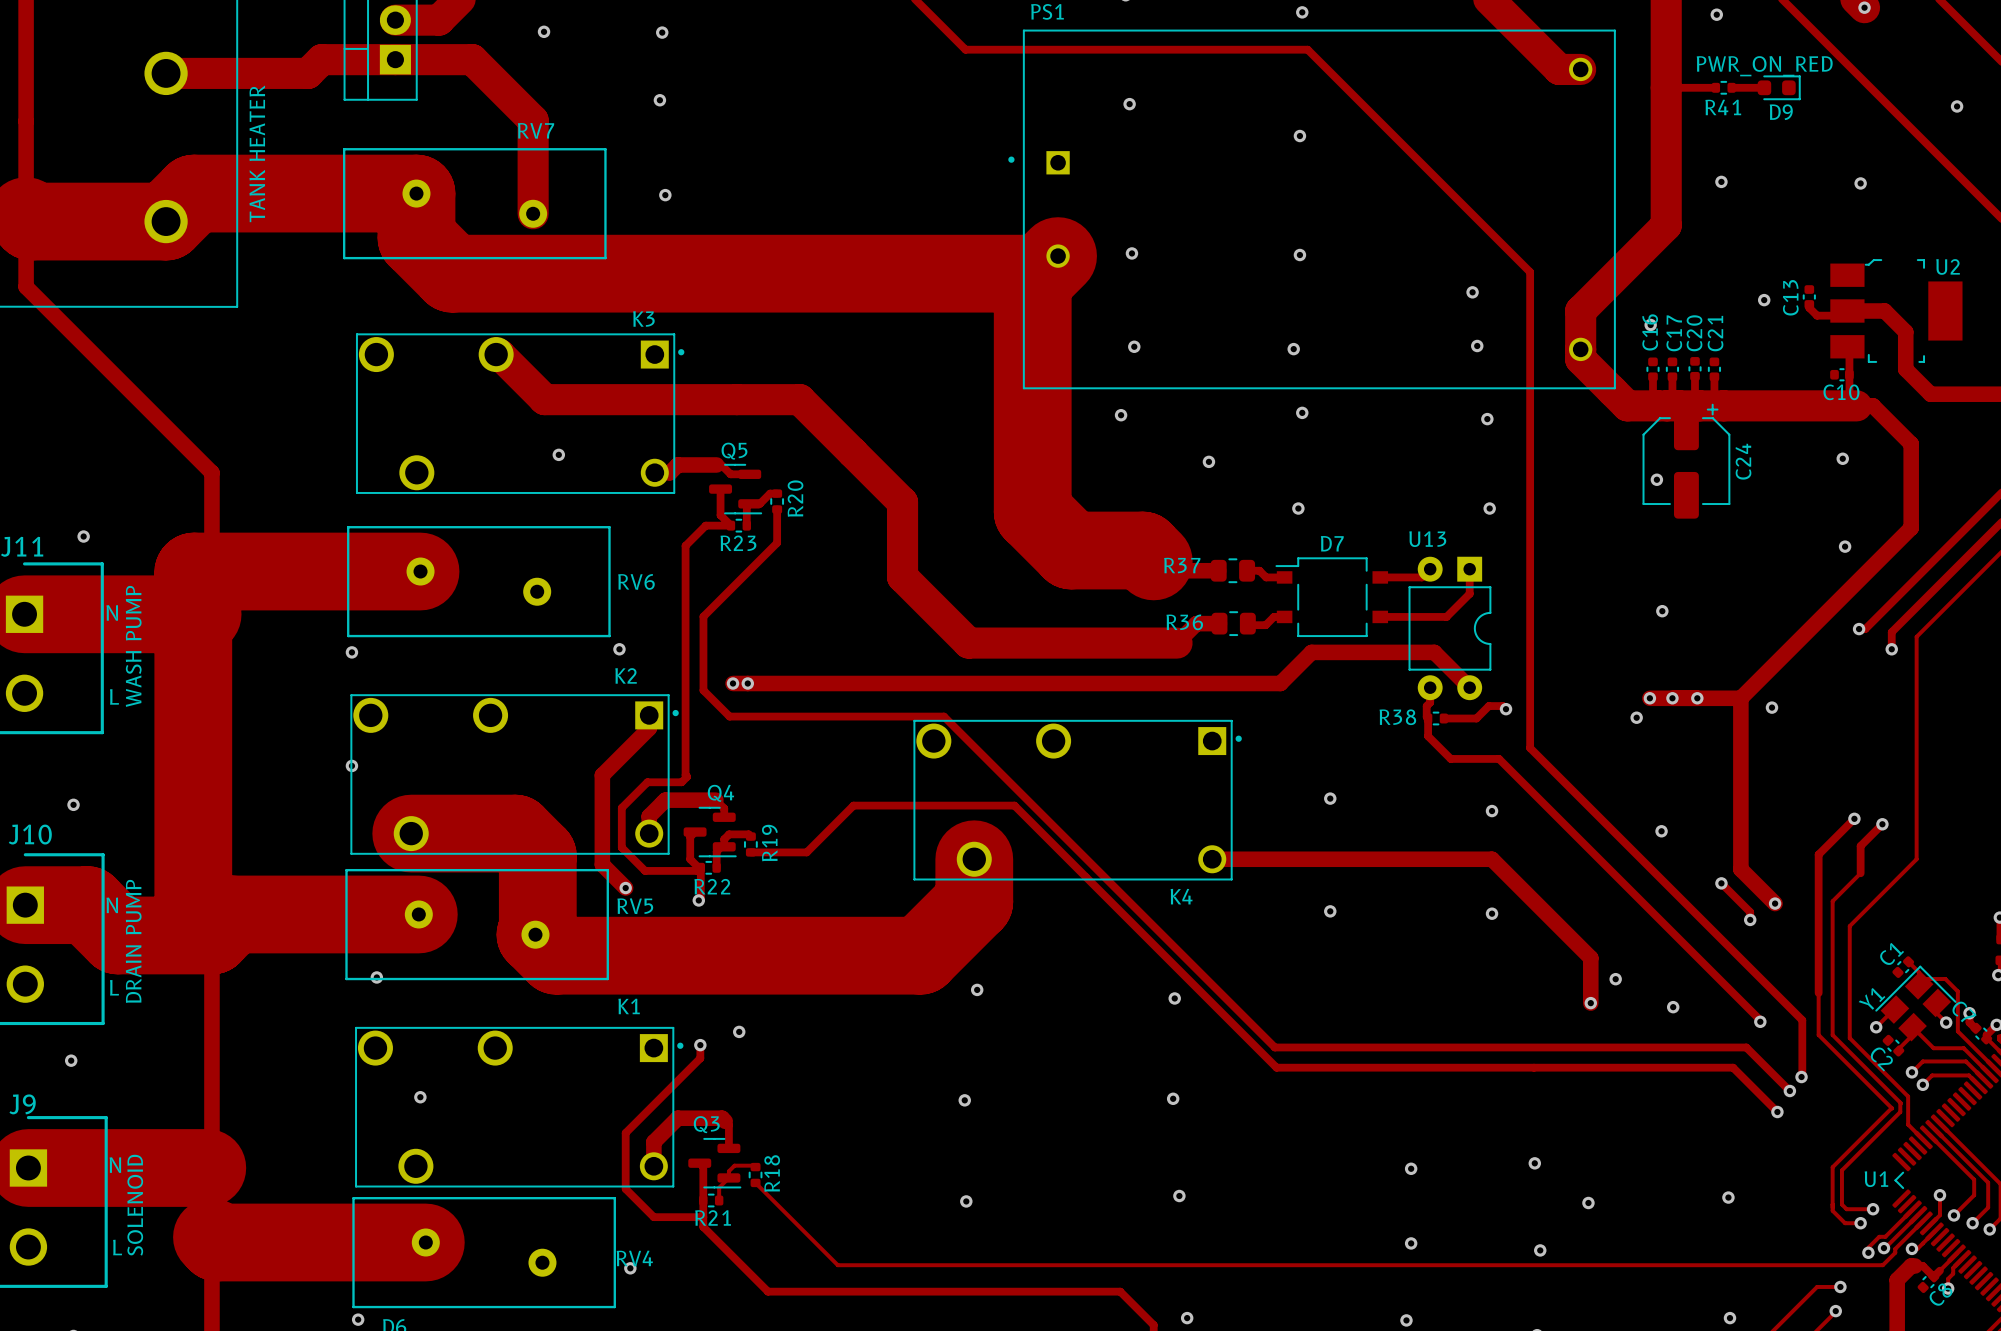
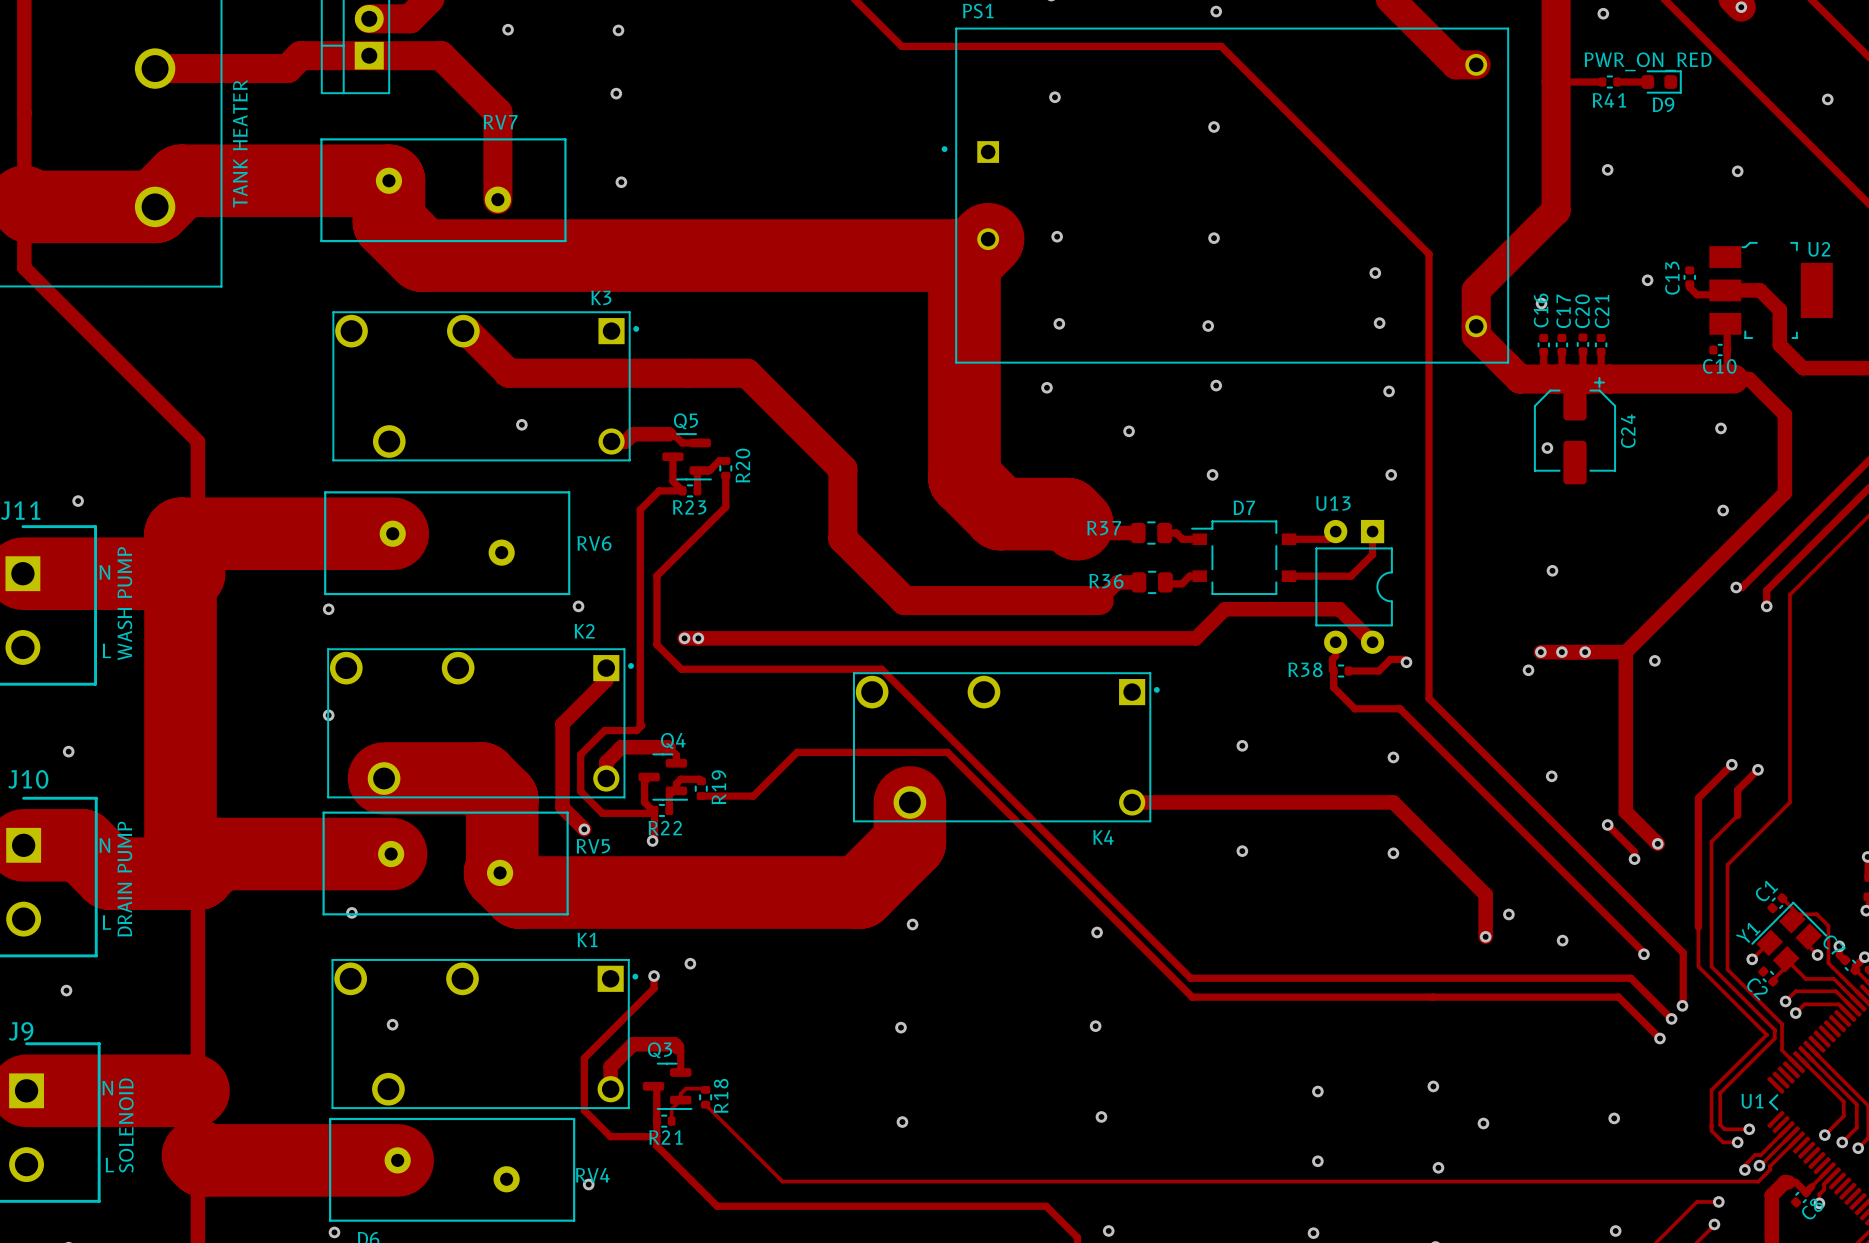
track: (1939, 1195) (1939, 1215) (1929, 1226) -> none
via: (1939, 1195) -> none
track: (1934, 1231) (1917, 1248) (1911, 1248) -> none
via: (1911, 1248) -> none

